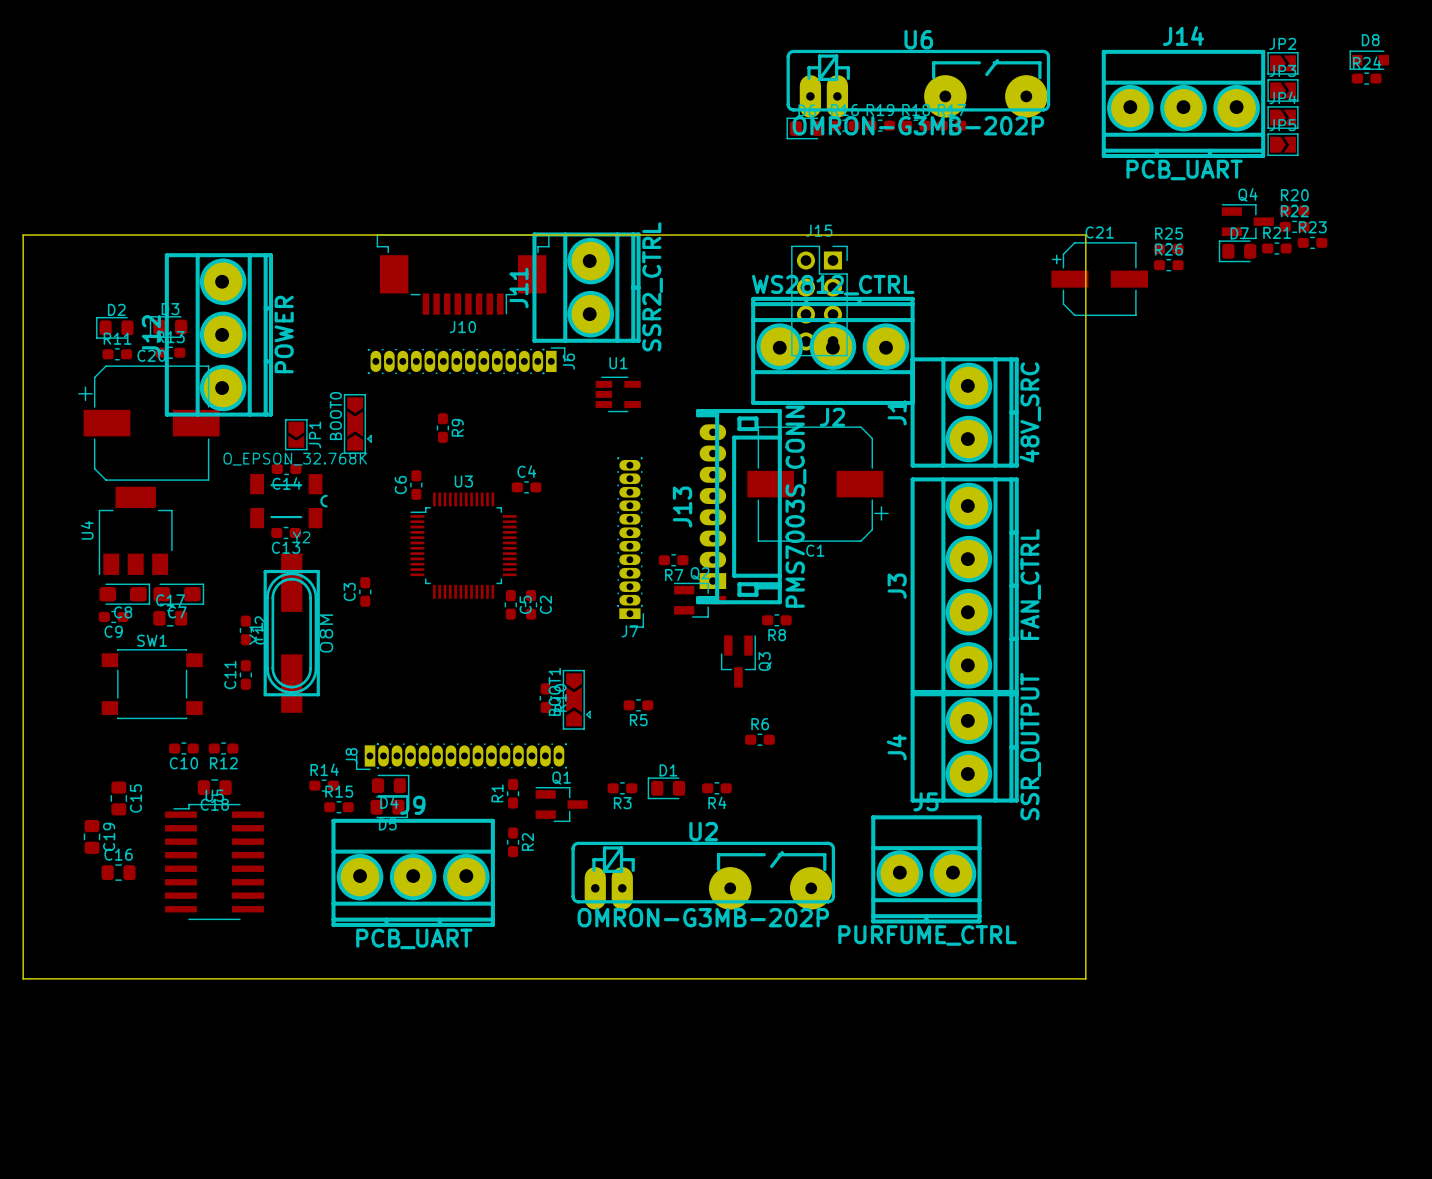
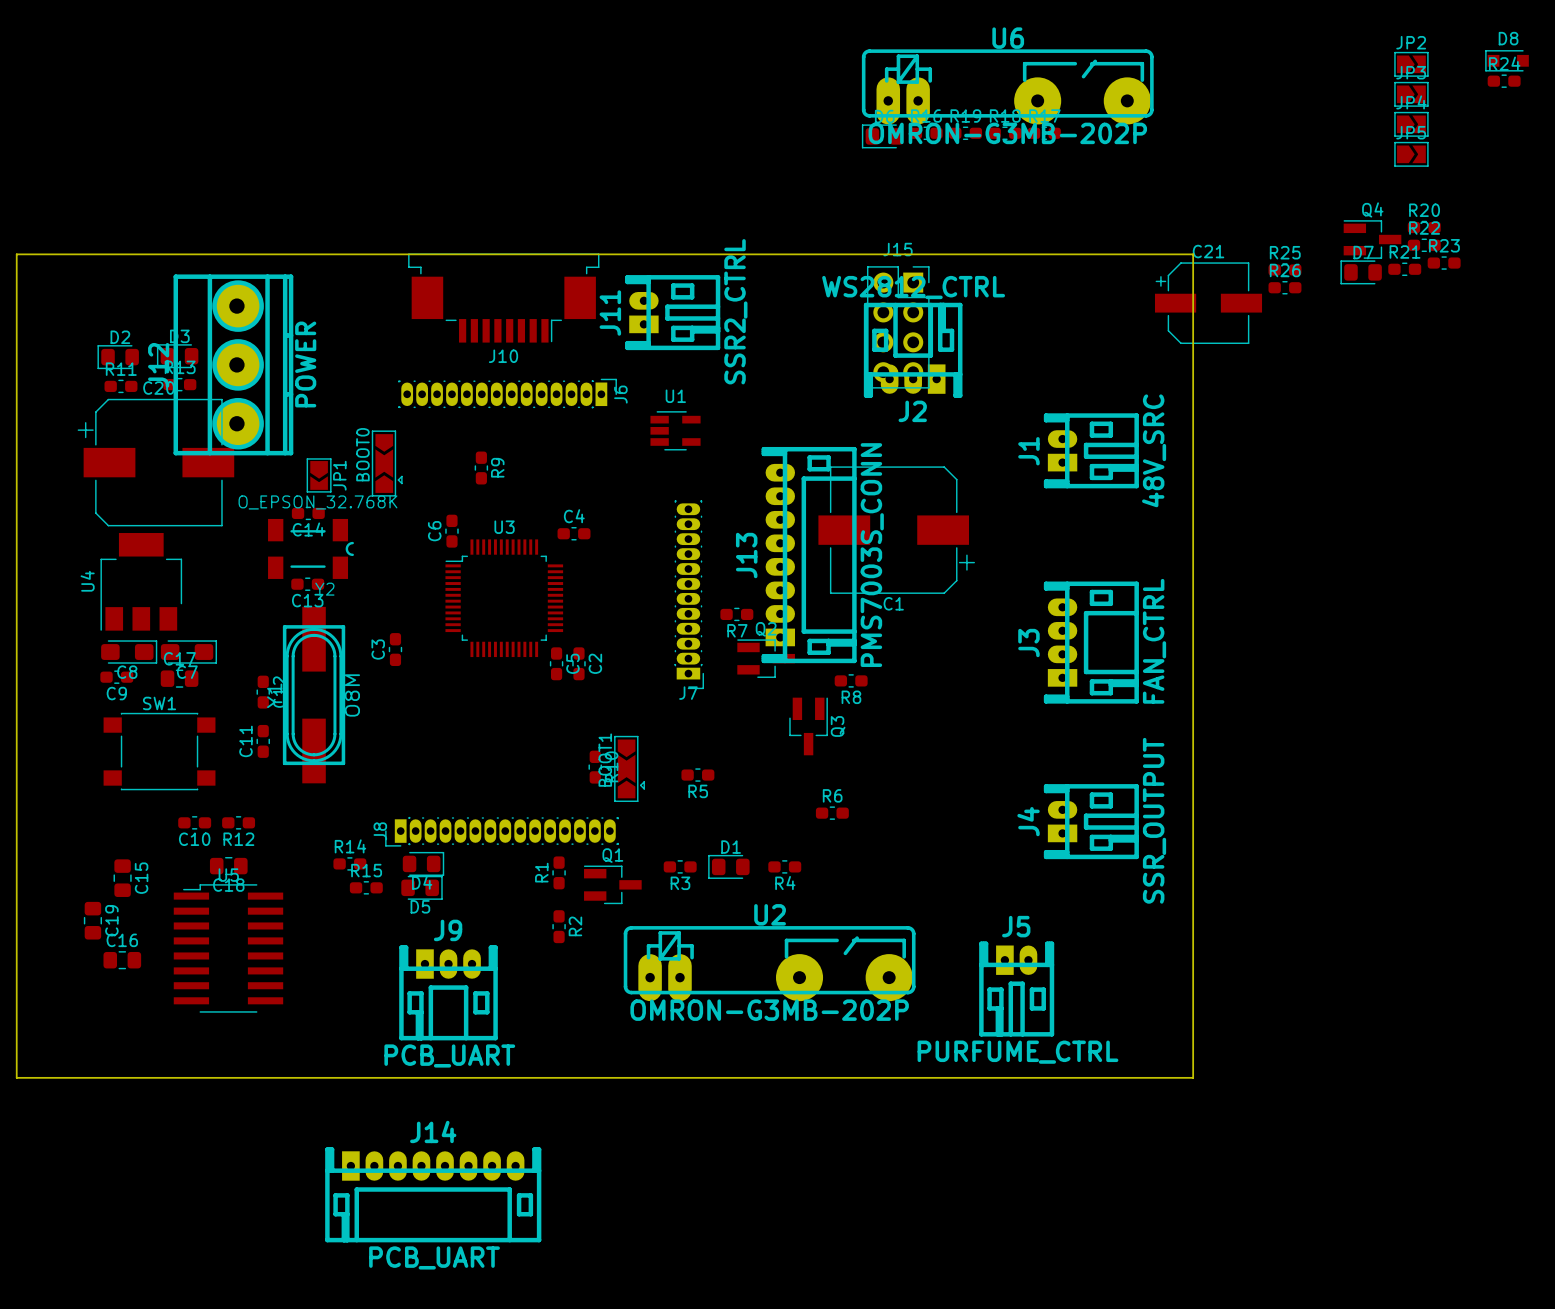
J14 footprint: [1101, 49, 1266, 159] -> [325, 1147, 542, 1243]
J11 footprint: [532, 232, 641, 343] -> [625, 275, 721, 351]
J2 footprint: [751, 296, 915, 405] -> [863, 302, 963, 398]
J1 footprint: [910, 357, 1019, 468] -> [1043, 413, 1139, 489]
J3 footprint: [910, 477, 1019, 694] -> [1043, 581, 1139, 704]
J4 footprint: [910, 692, 1019, 803] -> [1043, 784, 1139, 860]
J5 footprint: [871, 815, 982, 924] -> [979, 941, 1055, 1037]
J9 footprint: [331, 818, 495, 927] -> [399, 945, 498, 1041]

